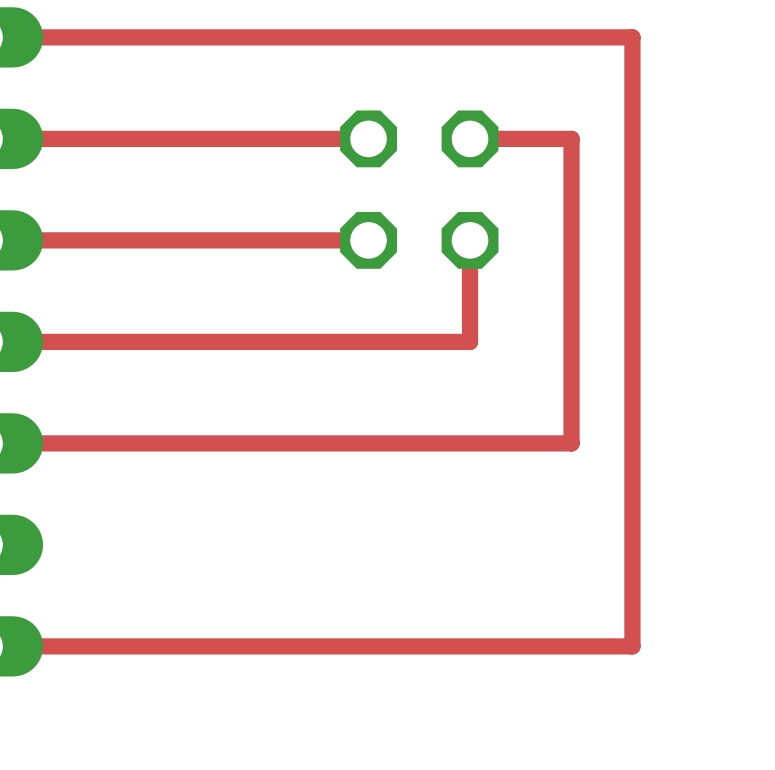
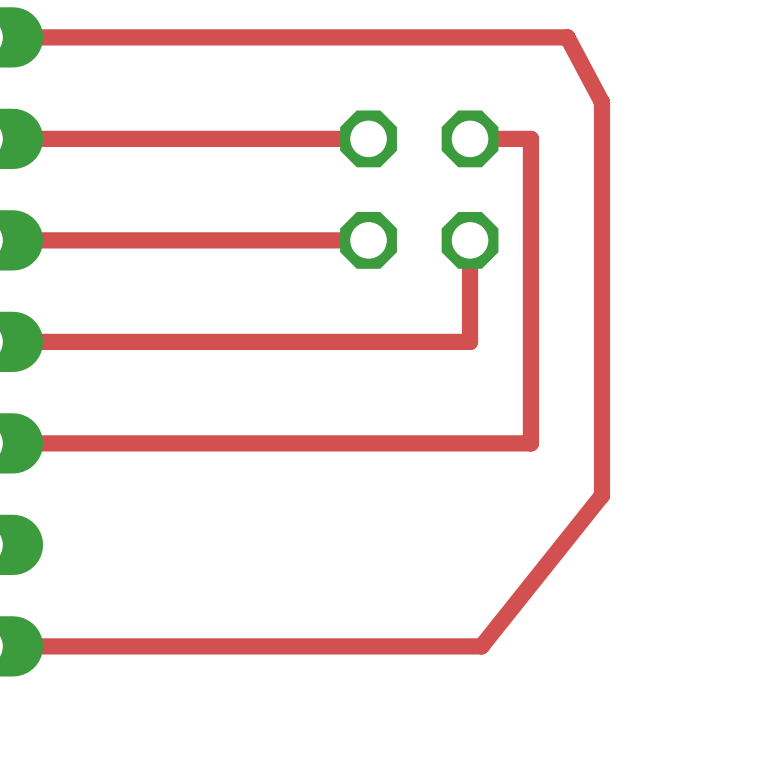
top track: (567, 37) (632, 37) (632, 646) (481, 646) -> (567, 37) (601, 102) (601, 495) (481, 646)
top track: (530, 138) (571, 138) (571, 443) (530, 443) -> (530, 138) (530, 443)

